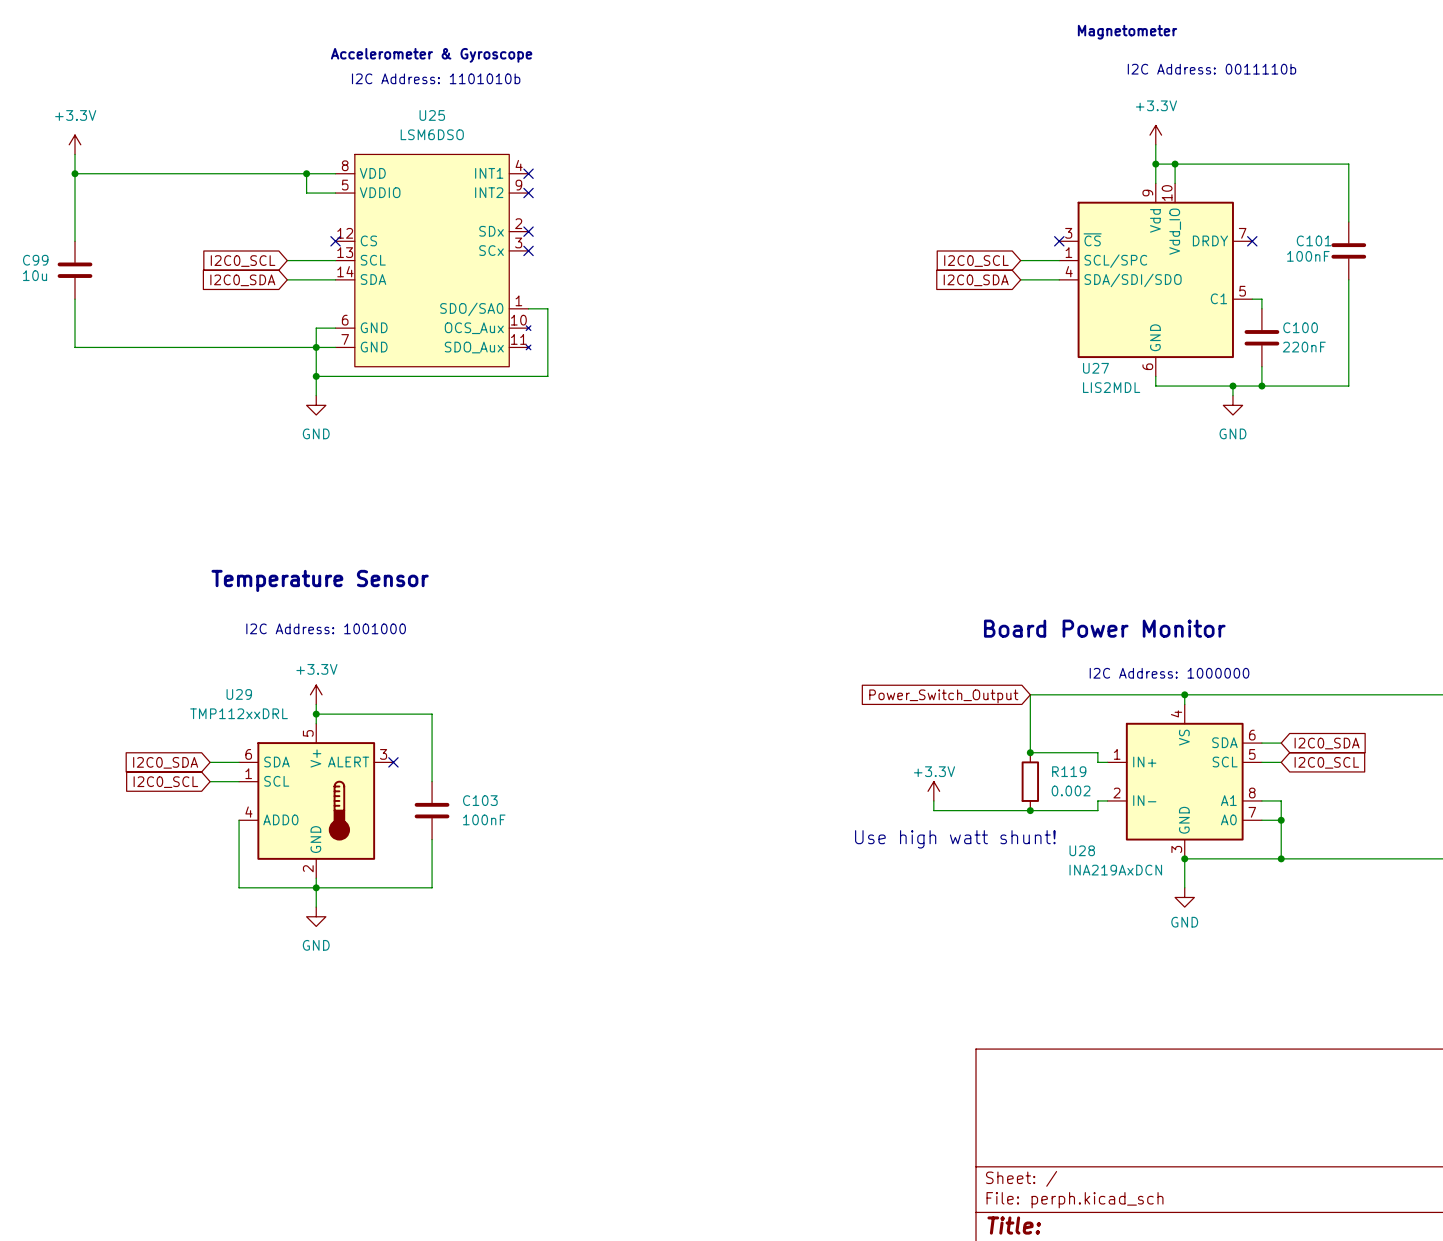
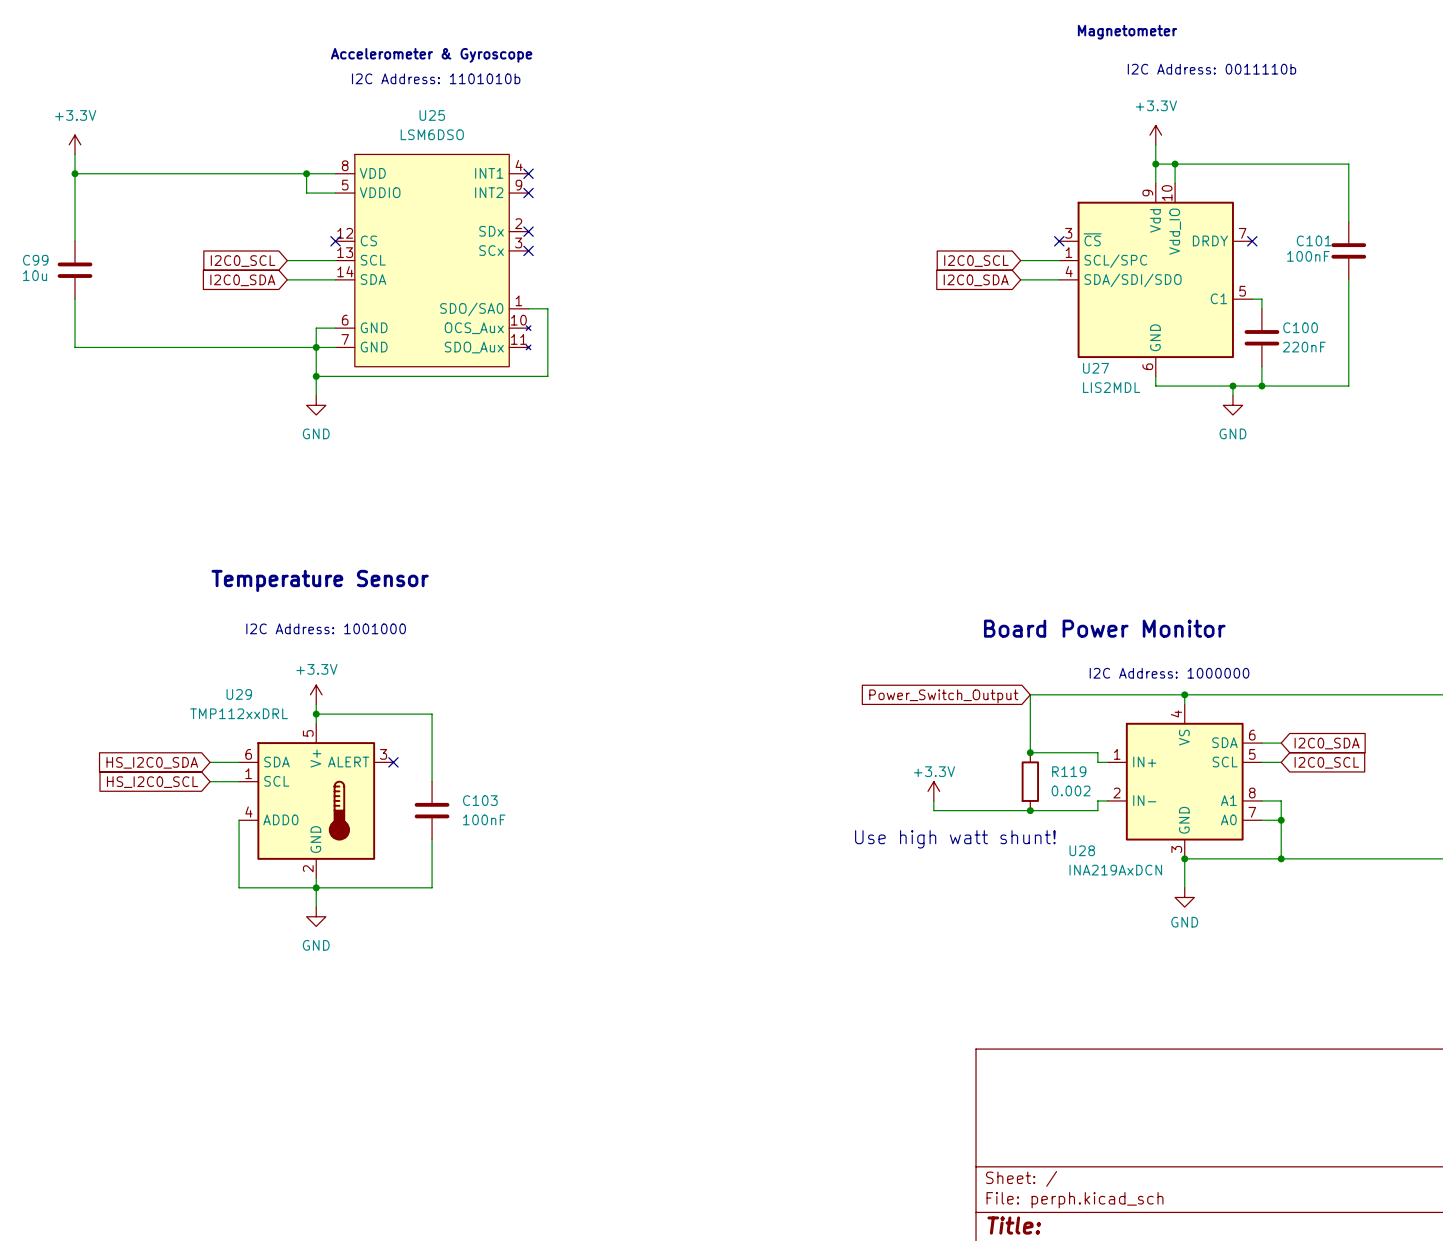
global label: I2C0_SDA (165, 762) -> HS_I2C0_SDA (152, 762)
global label: I2C0_SCL (165, 782) -> HS_I2C0_SCL (152, 782)

